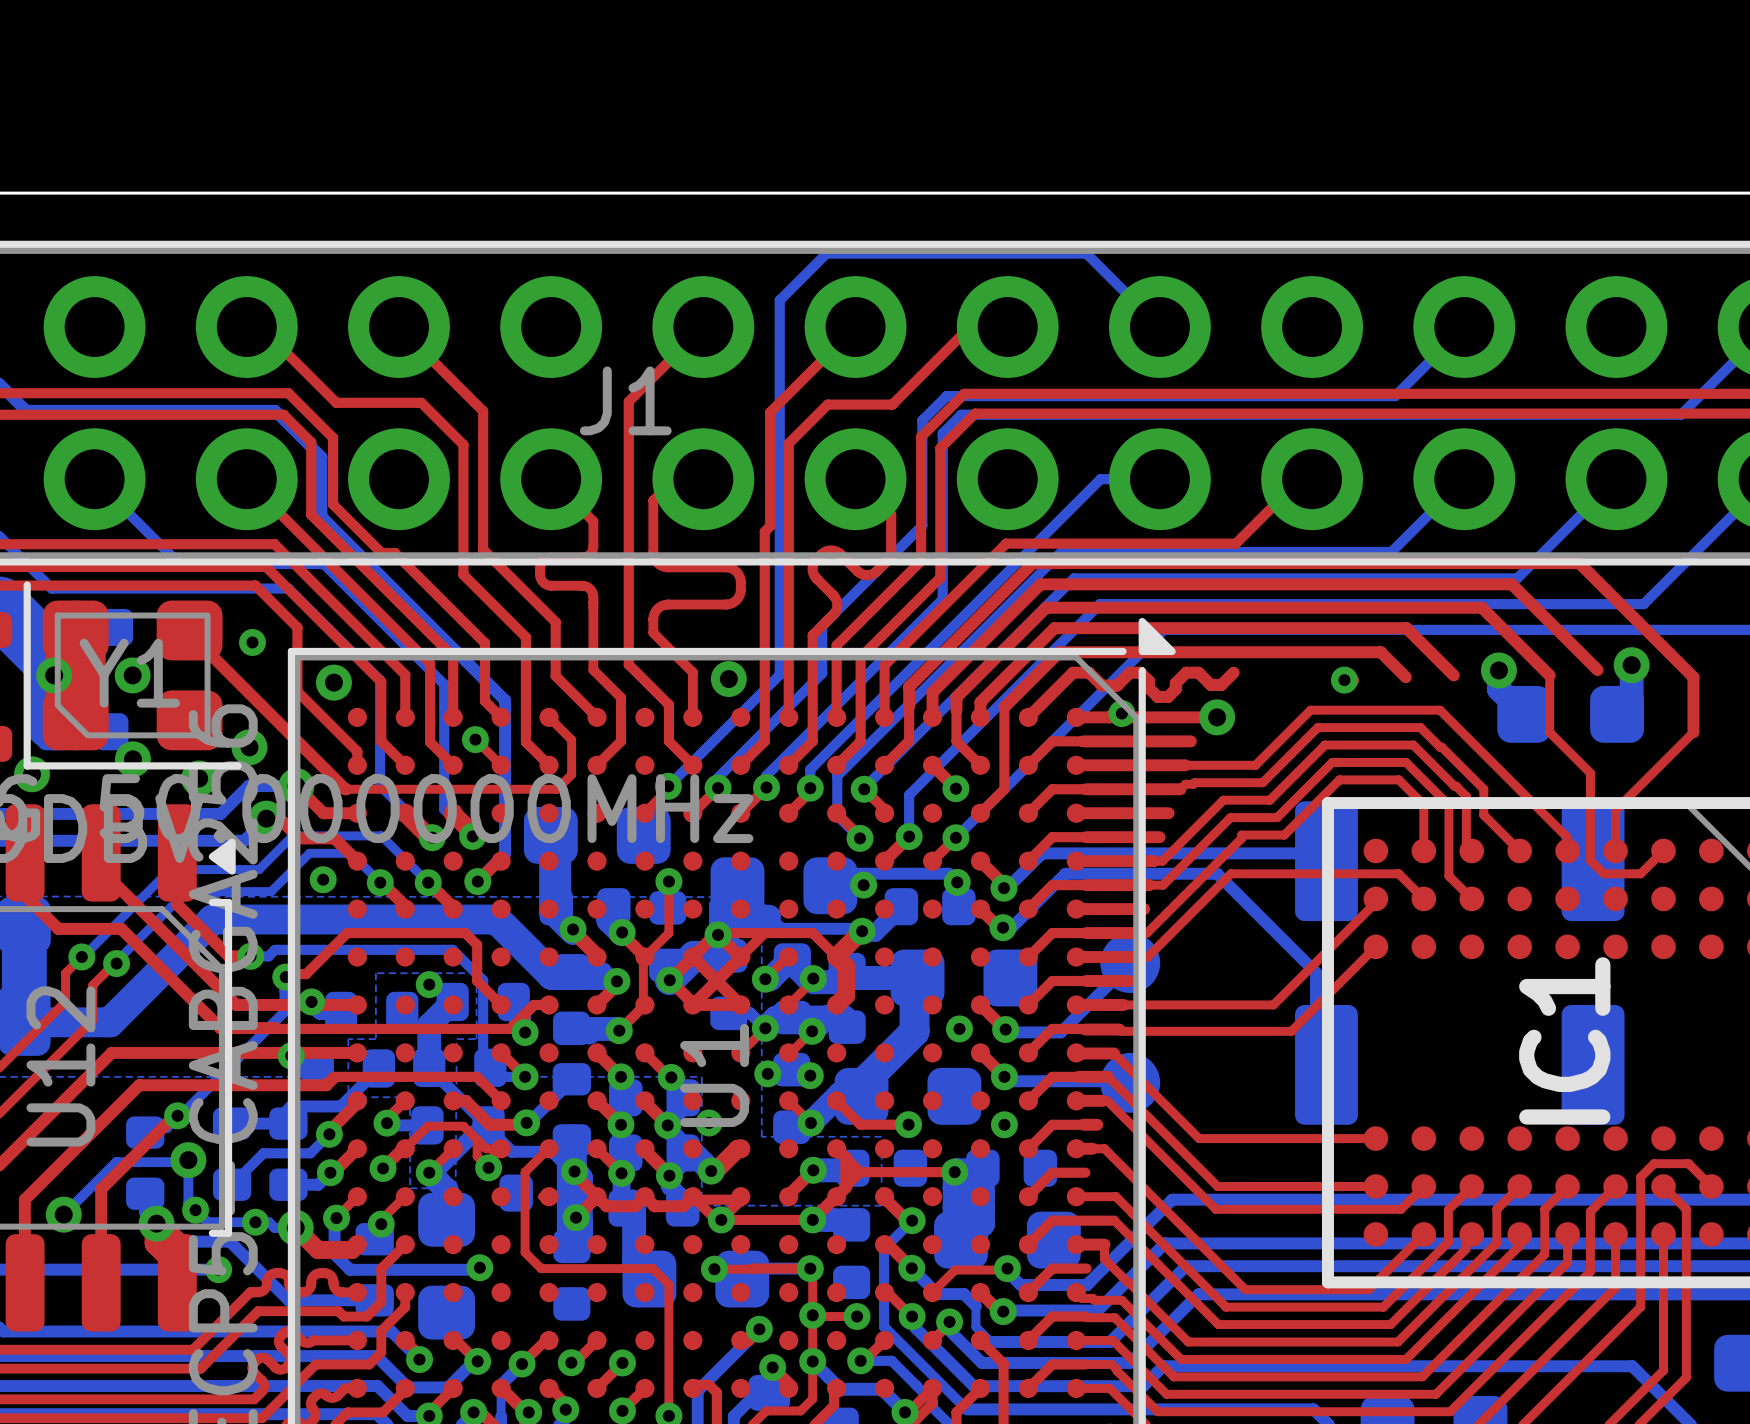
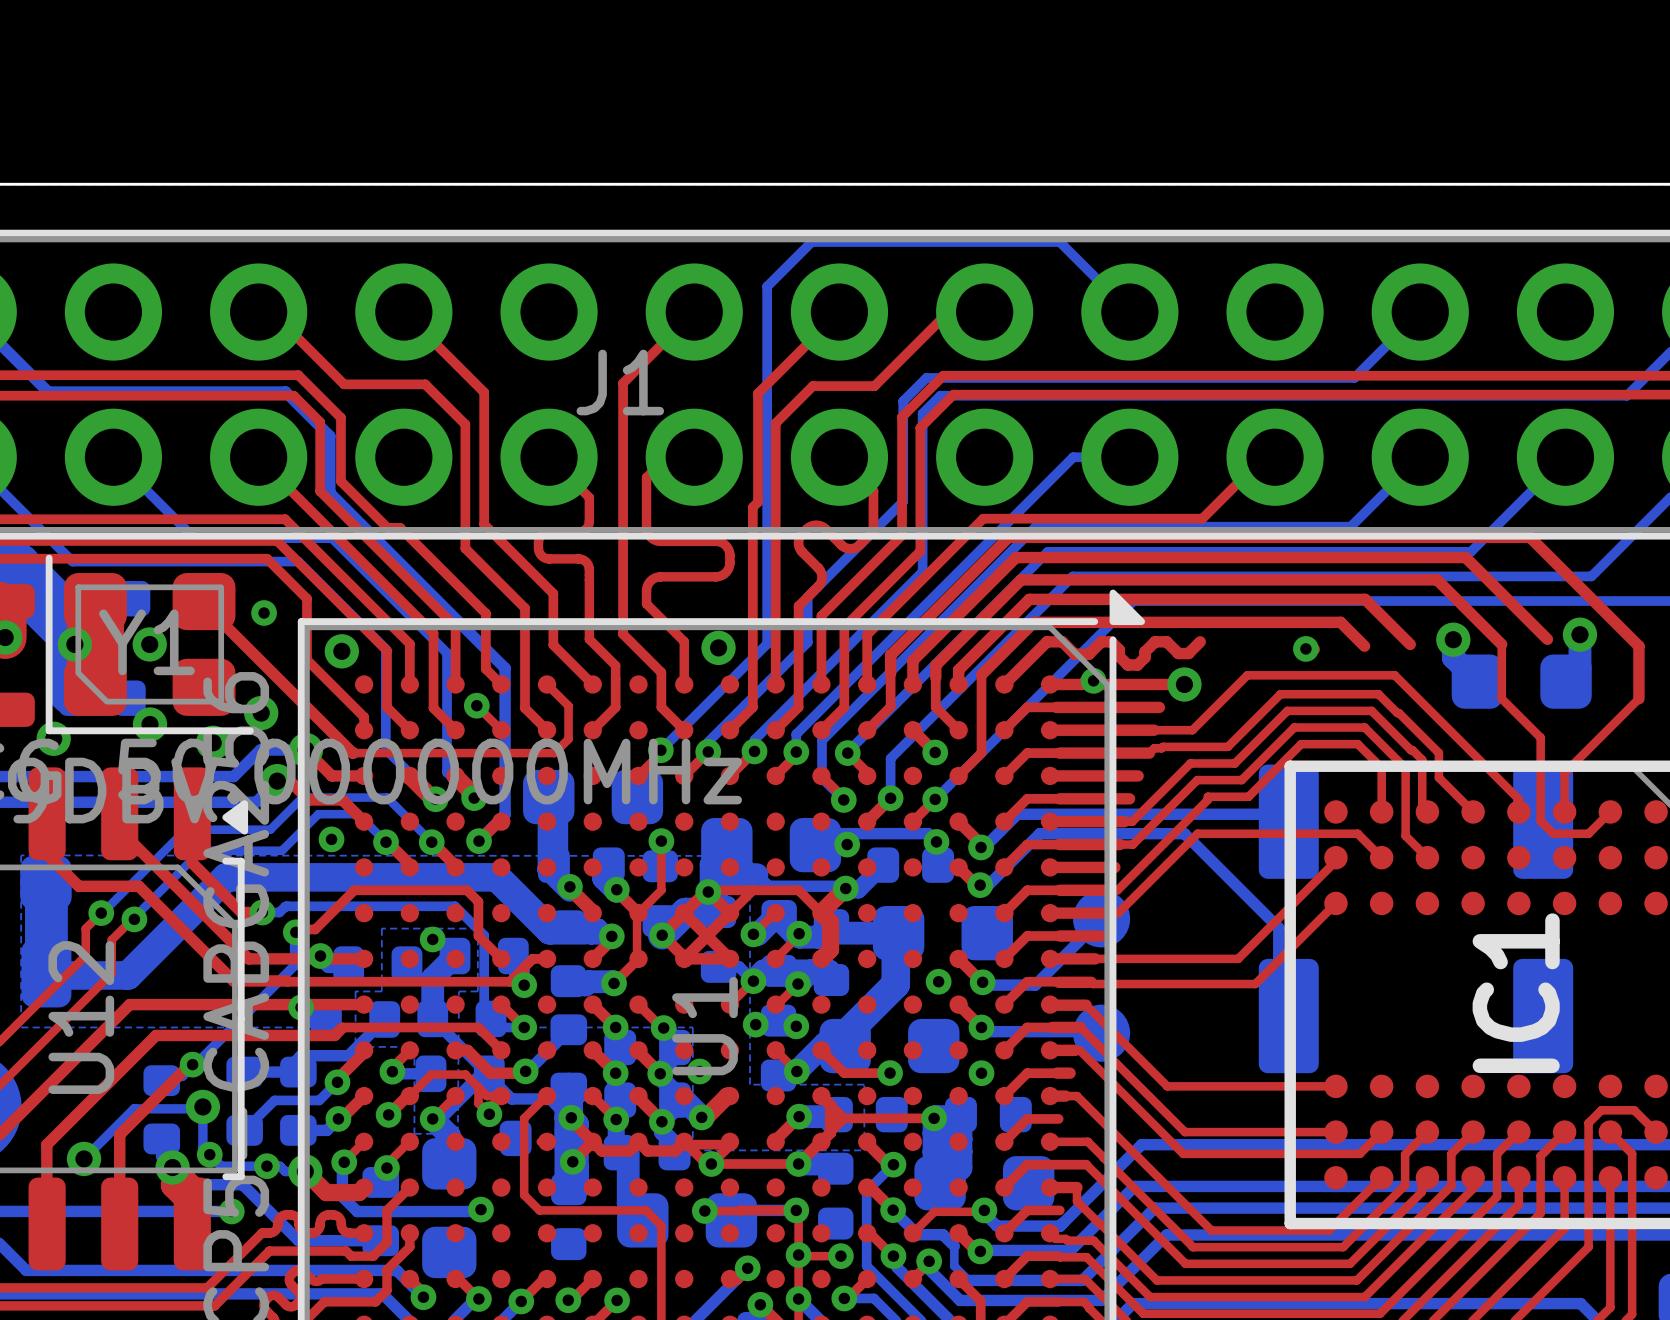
top track: (1440, 710) (1310, 710) (1255, 765) (1225, 765) -> (1397, 677) (1394, 675) (1247, 675) (1192, 730)

